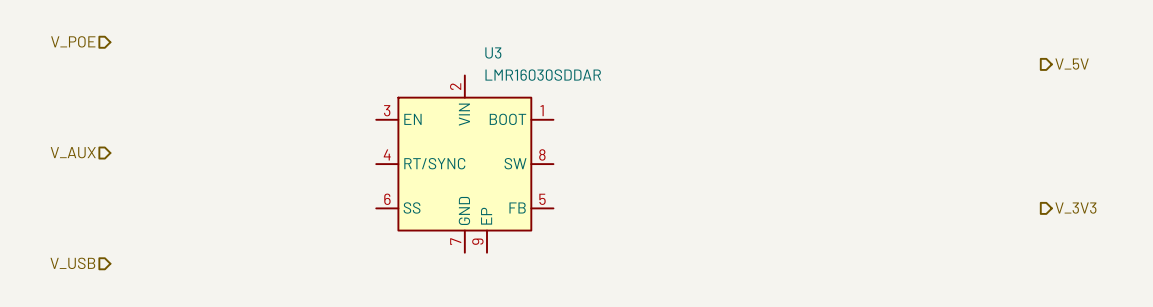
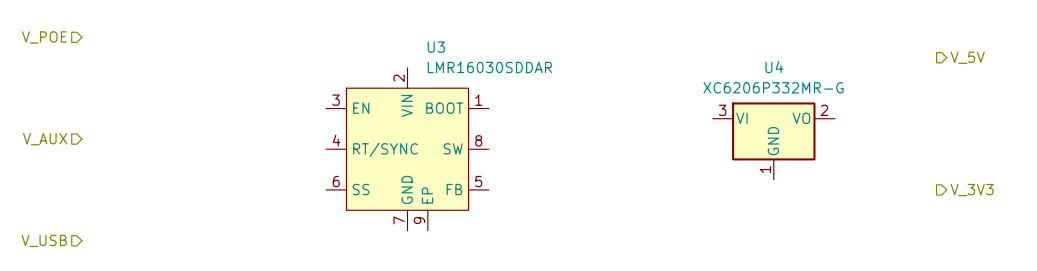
U4: none -> XC6206P332MR-G (773, 141)

